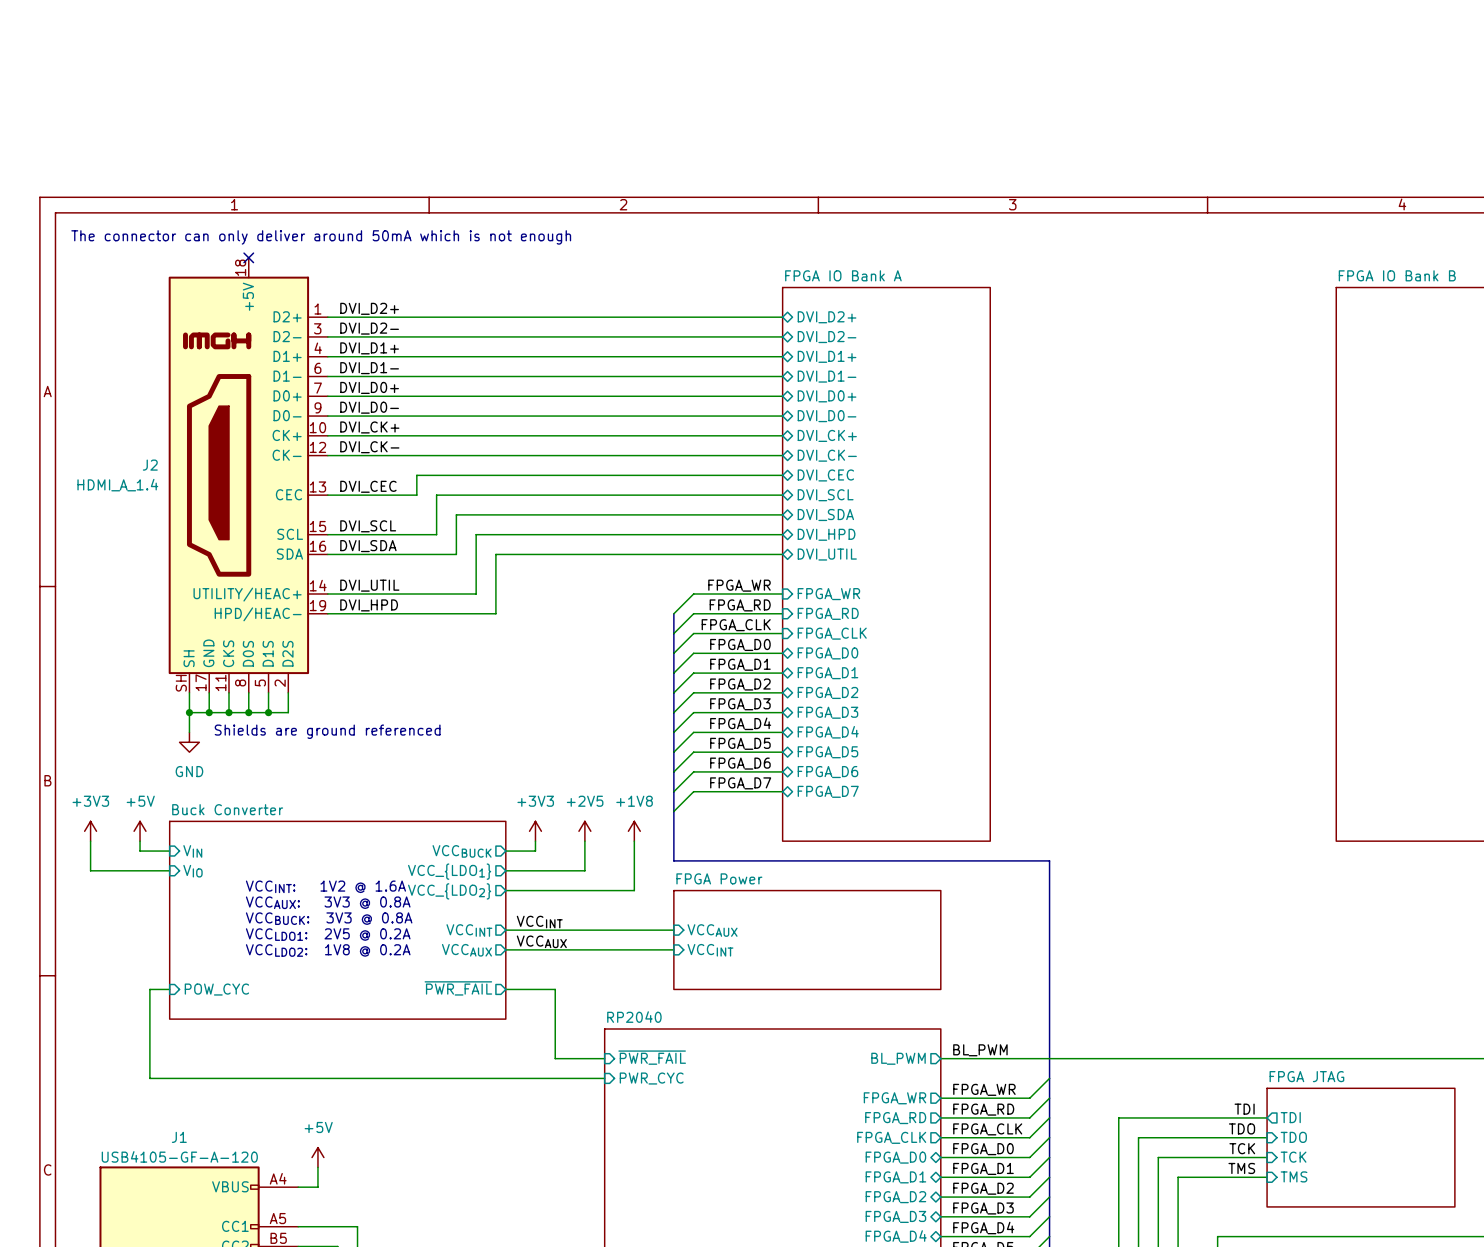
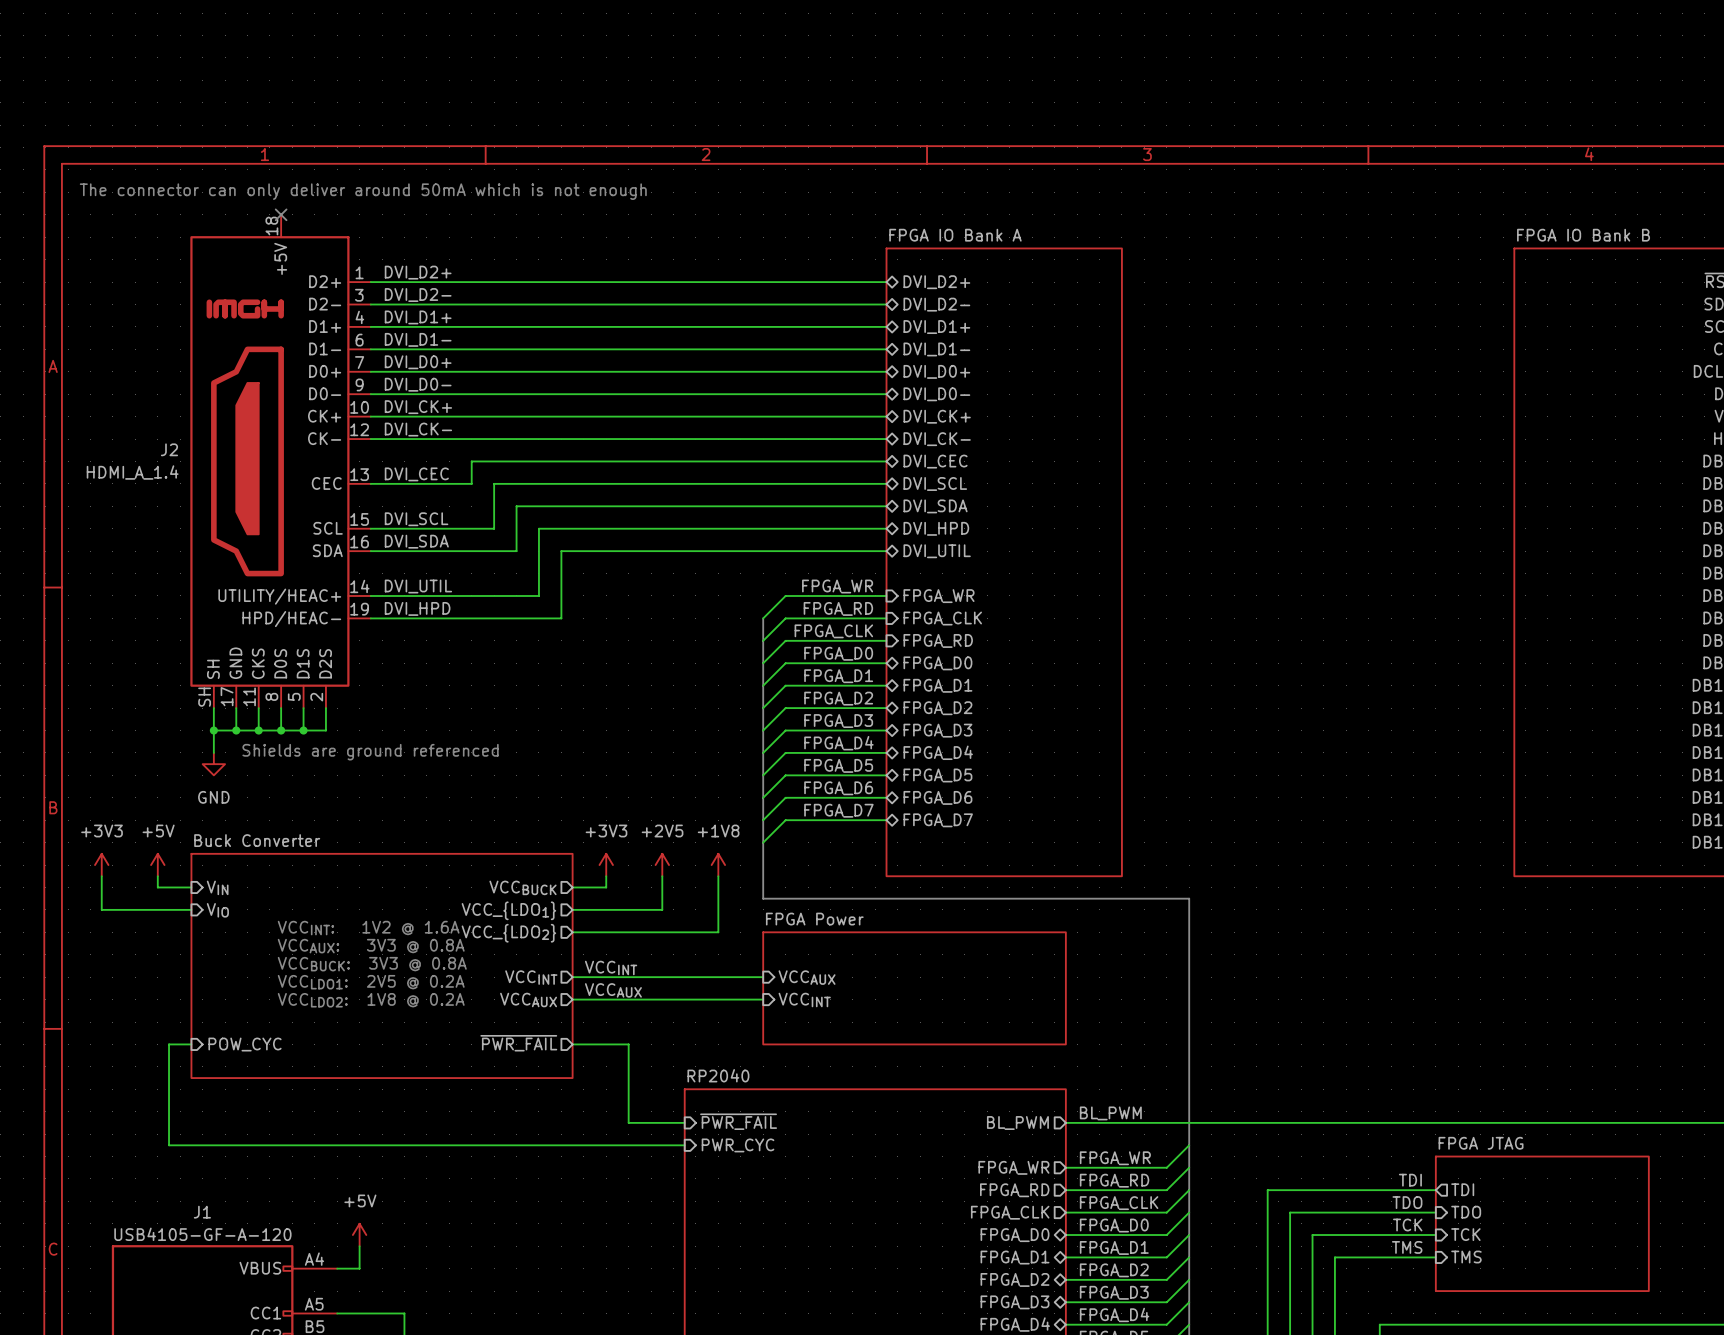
sheet pin: FPGA_RD (828, 613) -> FPGA_CLK (942, 618)
sheet pin: FPGA_CLK (832, 633) -> FPGA_RD (938, 640)

